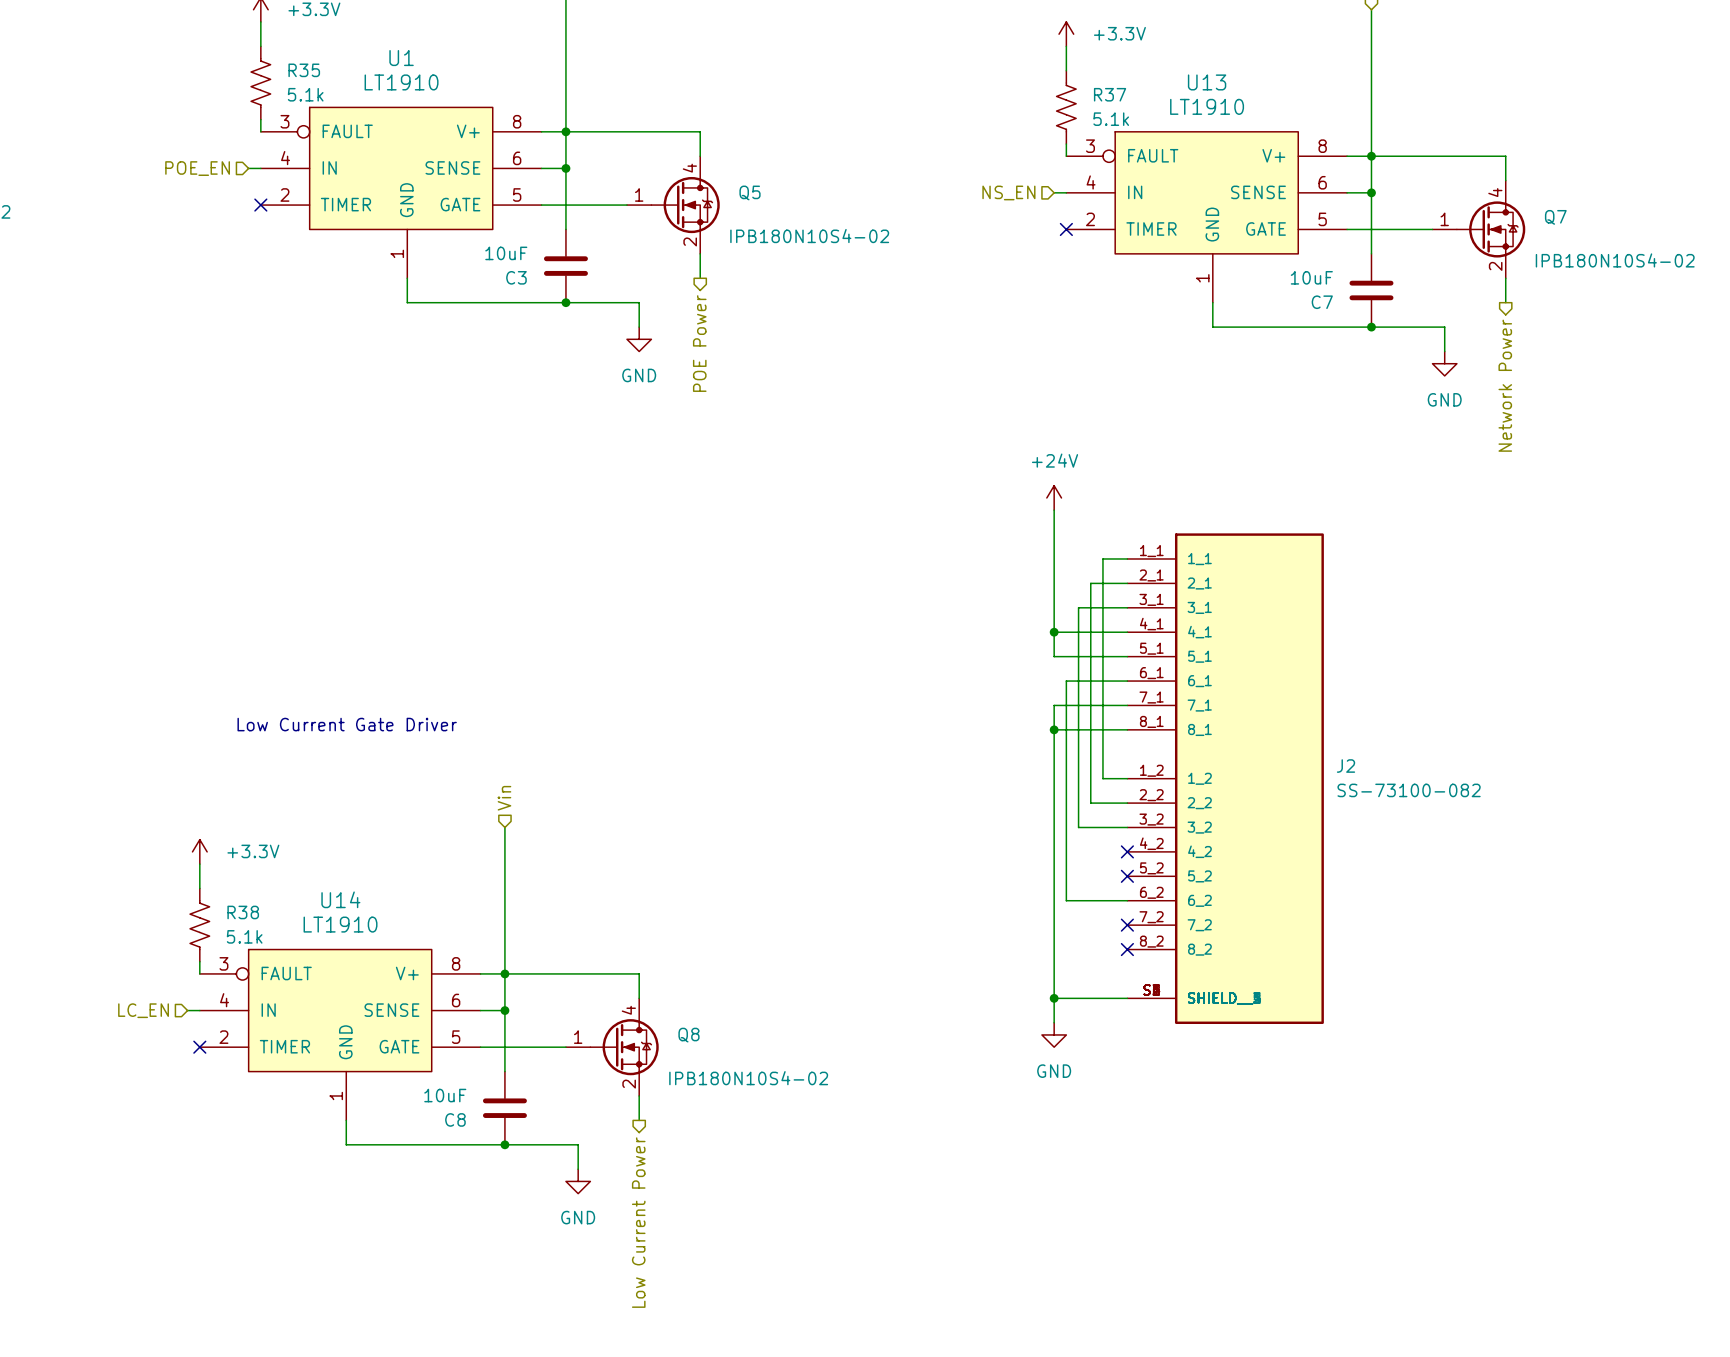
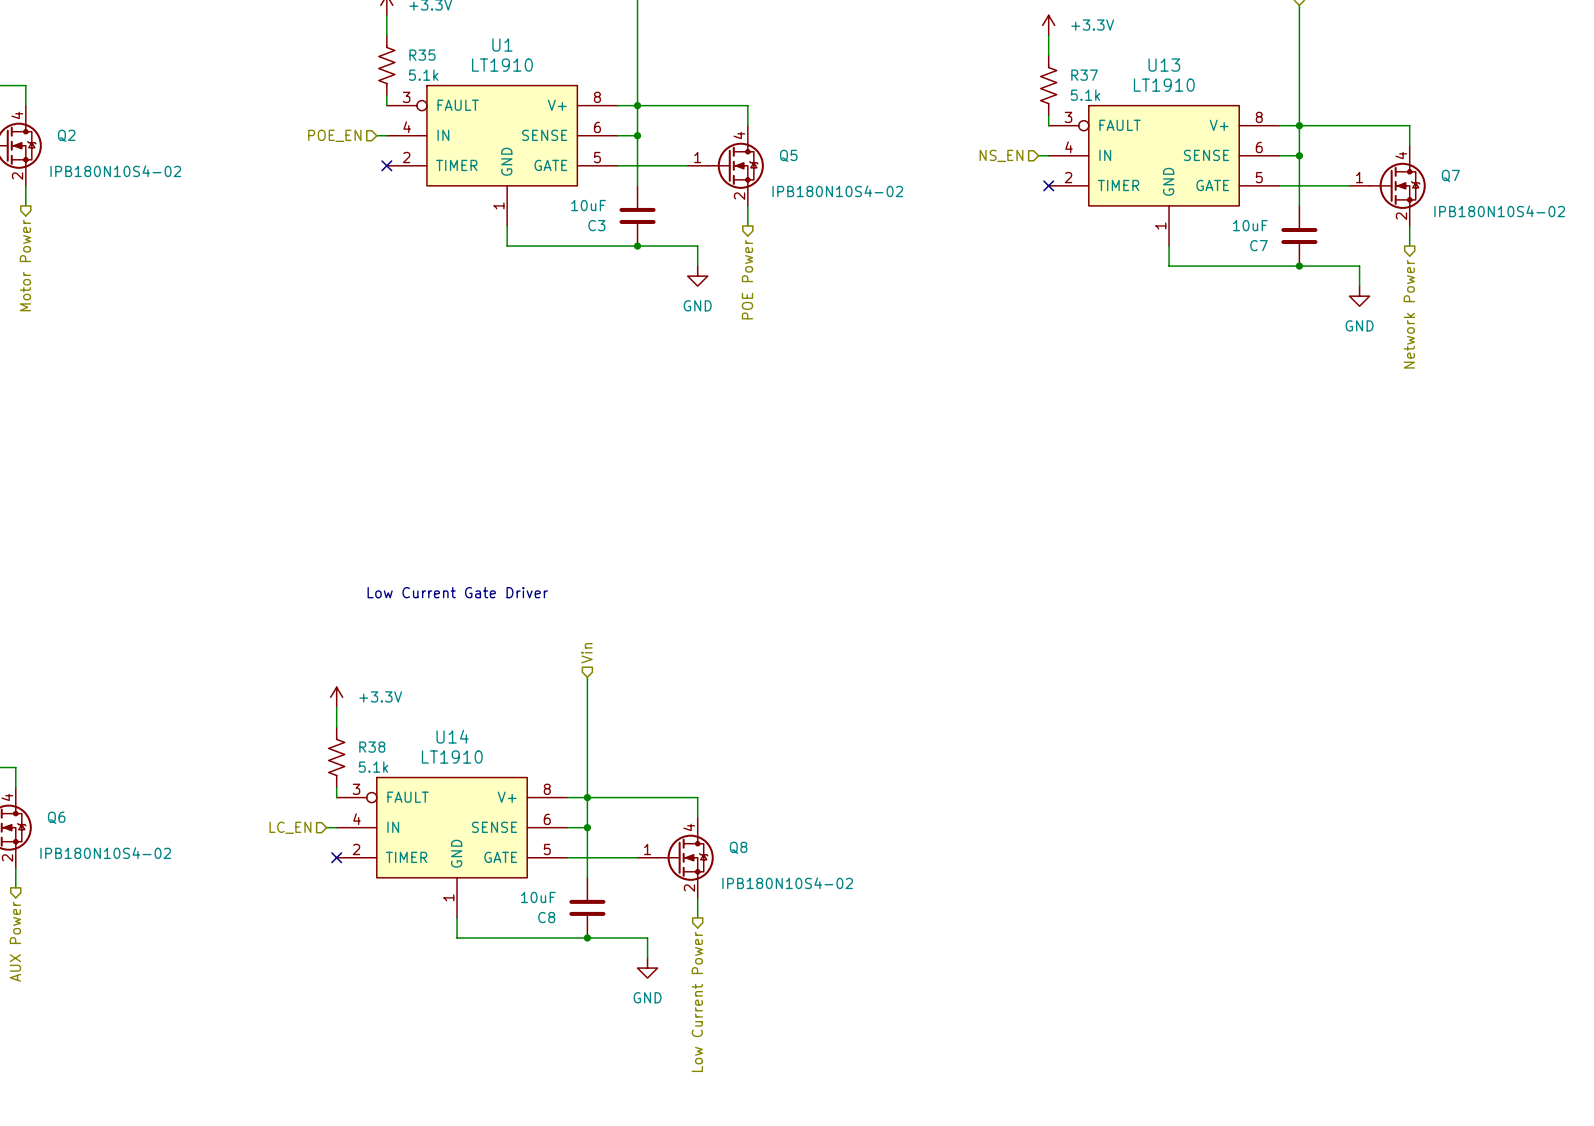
power symbol: +24V (1054, 497) -> none
wire: (1054, 510) (1054, 656) (1127, 656) -> none
wire: (1127, 558) (1102, 558) (1102, 778) (1127, 778) -> none
wire: (1127, 583) (1090, 583) (1090, 803) (1127, 803) -> none
wire: (1127, 607) (1078, 607) (1078, 827) (1127, 827) -> none
wire: (1054, 632) (1127, 632) -> none
junction: (1054, 632) -> none
wire: (1127, 681) (1066, 681) (1066, 900) (1127, 900) -> none
wire: (1127, 705) (1054, 705) (1054, 1022) -> none
wire: (1054, 729) (1127, 729) -> none
junction: (1054, 729) -> none
J2: SS-73100-082 (1225, 778) -> none
no-connect mark: (1127, 851) -> none
no-connect mark: (1127, 876) -> none
no-connect mark: (1127, 925) -> none
no-connect mark: (1127, 949) -> none
wire: (1054, 998) (1127, 998) -> none
junction: (1054, 998) -> none
power symbol: GND (1054, 1034) -> none

